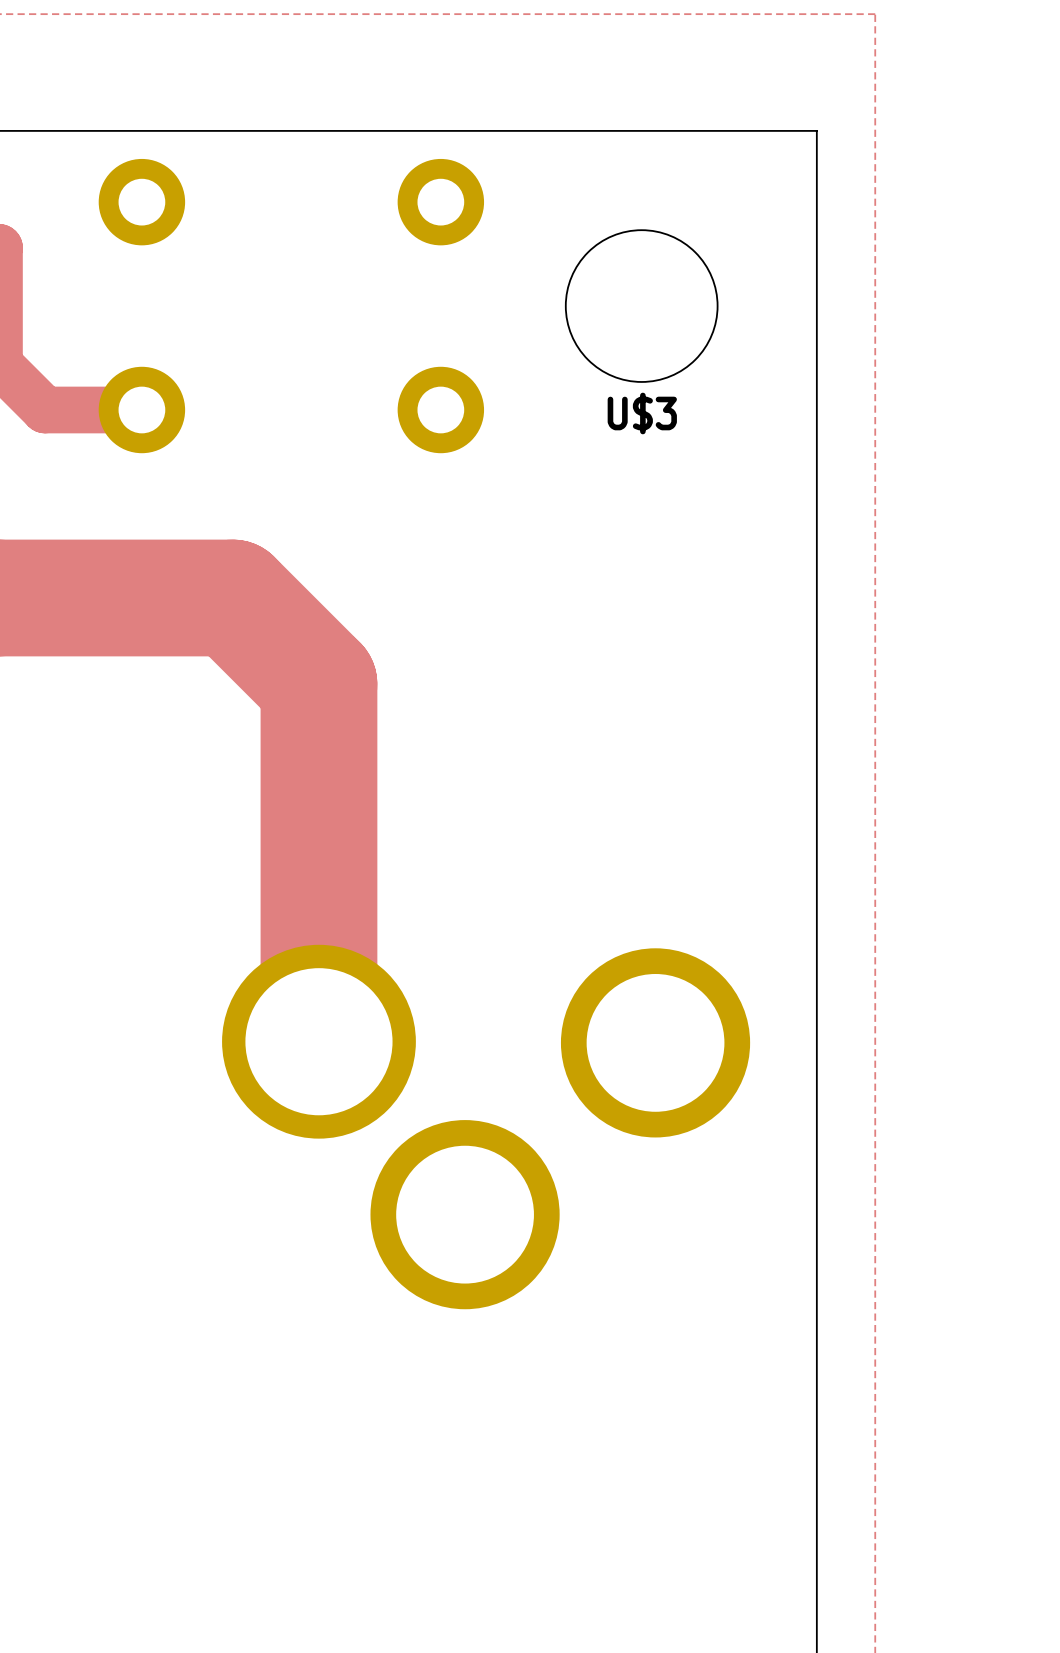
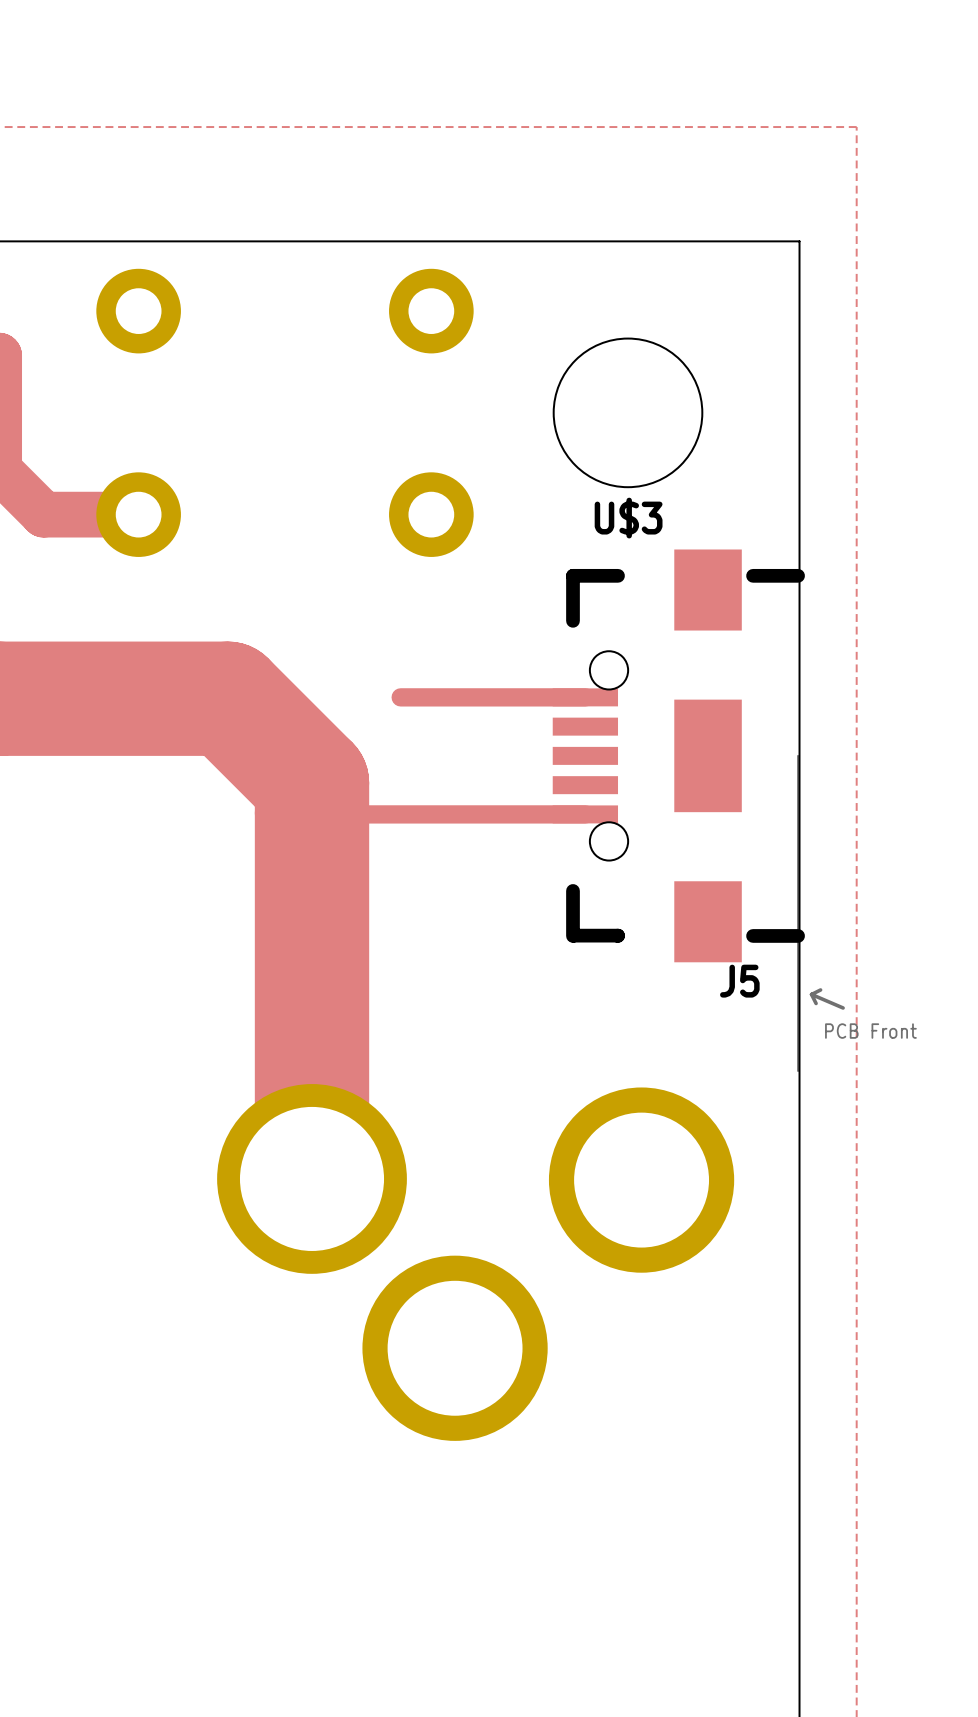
track: none -> (585, 697) (399, 698)
J5: none -> (698, 810)
track: none -> (312, 813) (585, 814)
part position: (486, 1127) -> (475, 1262)

